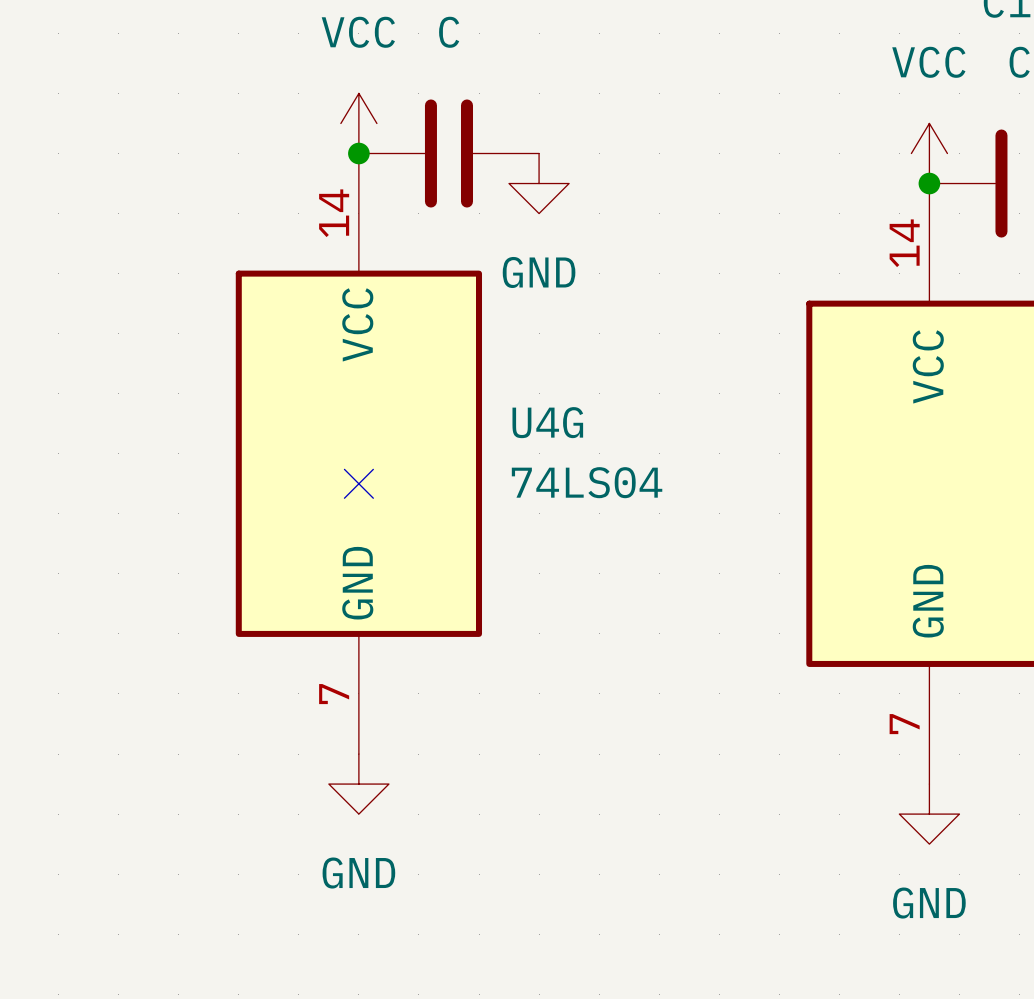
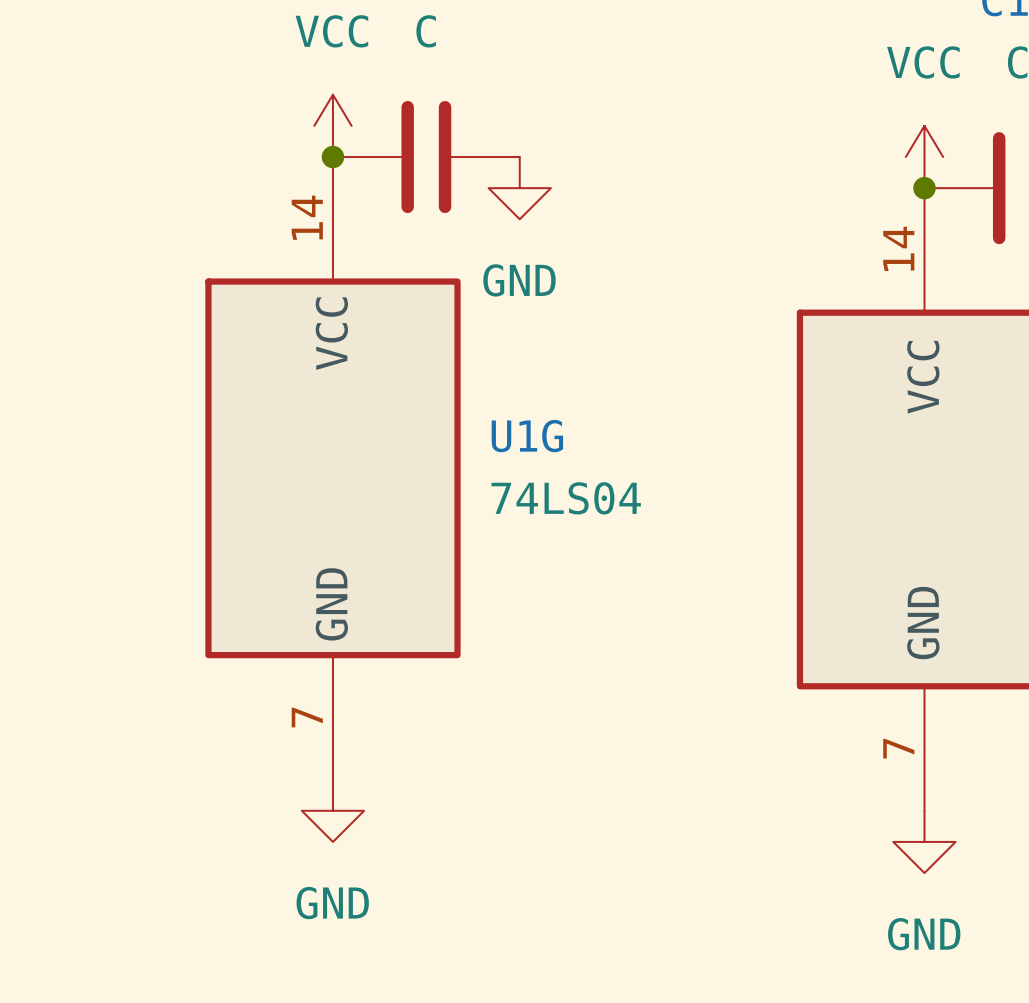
U4G name: U4G (547, 422) -> U1G (527, 436)
no-connect mark: (358, 483) -> none

